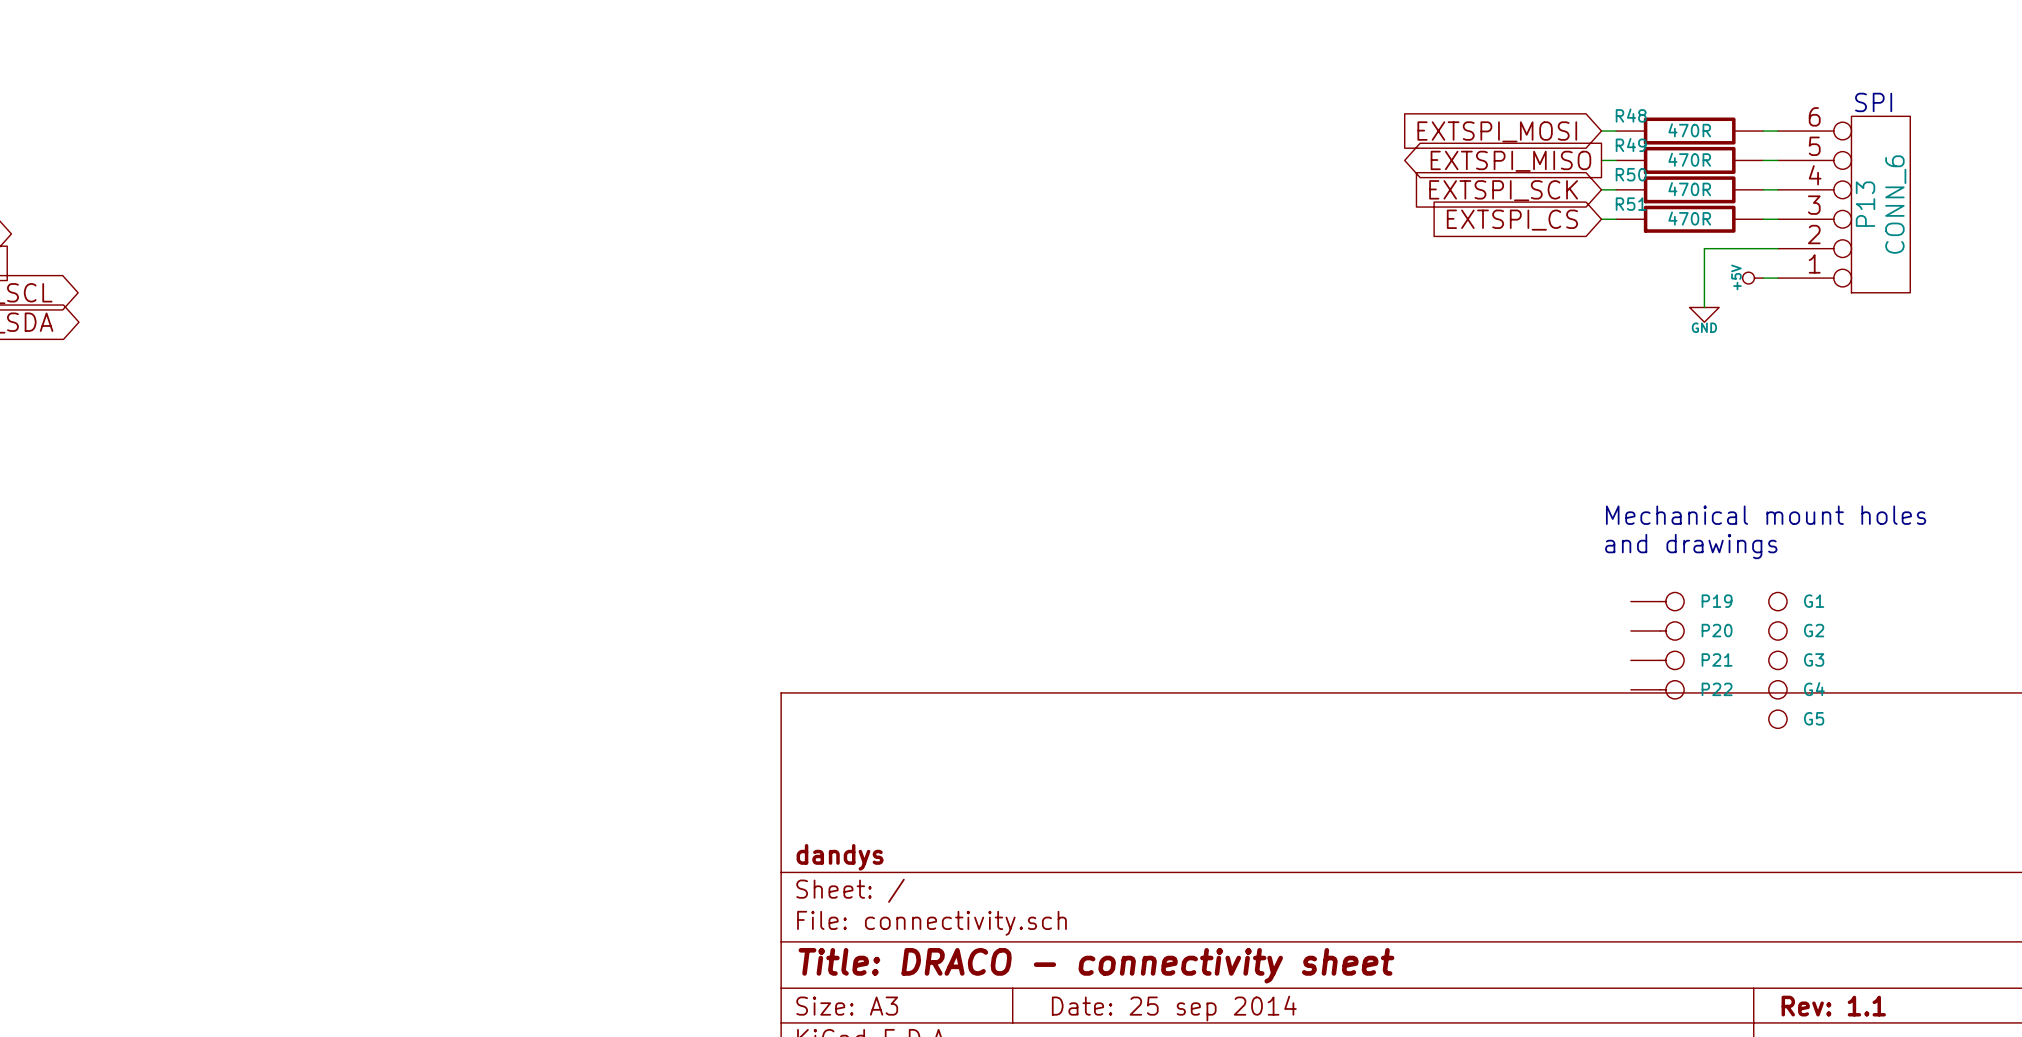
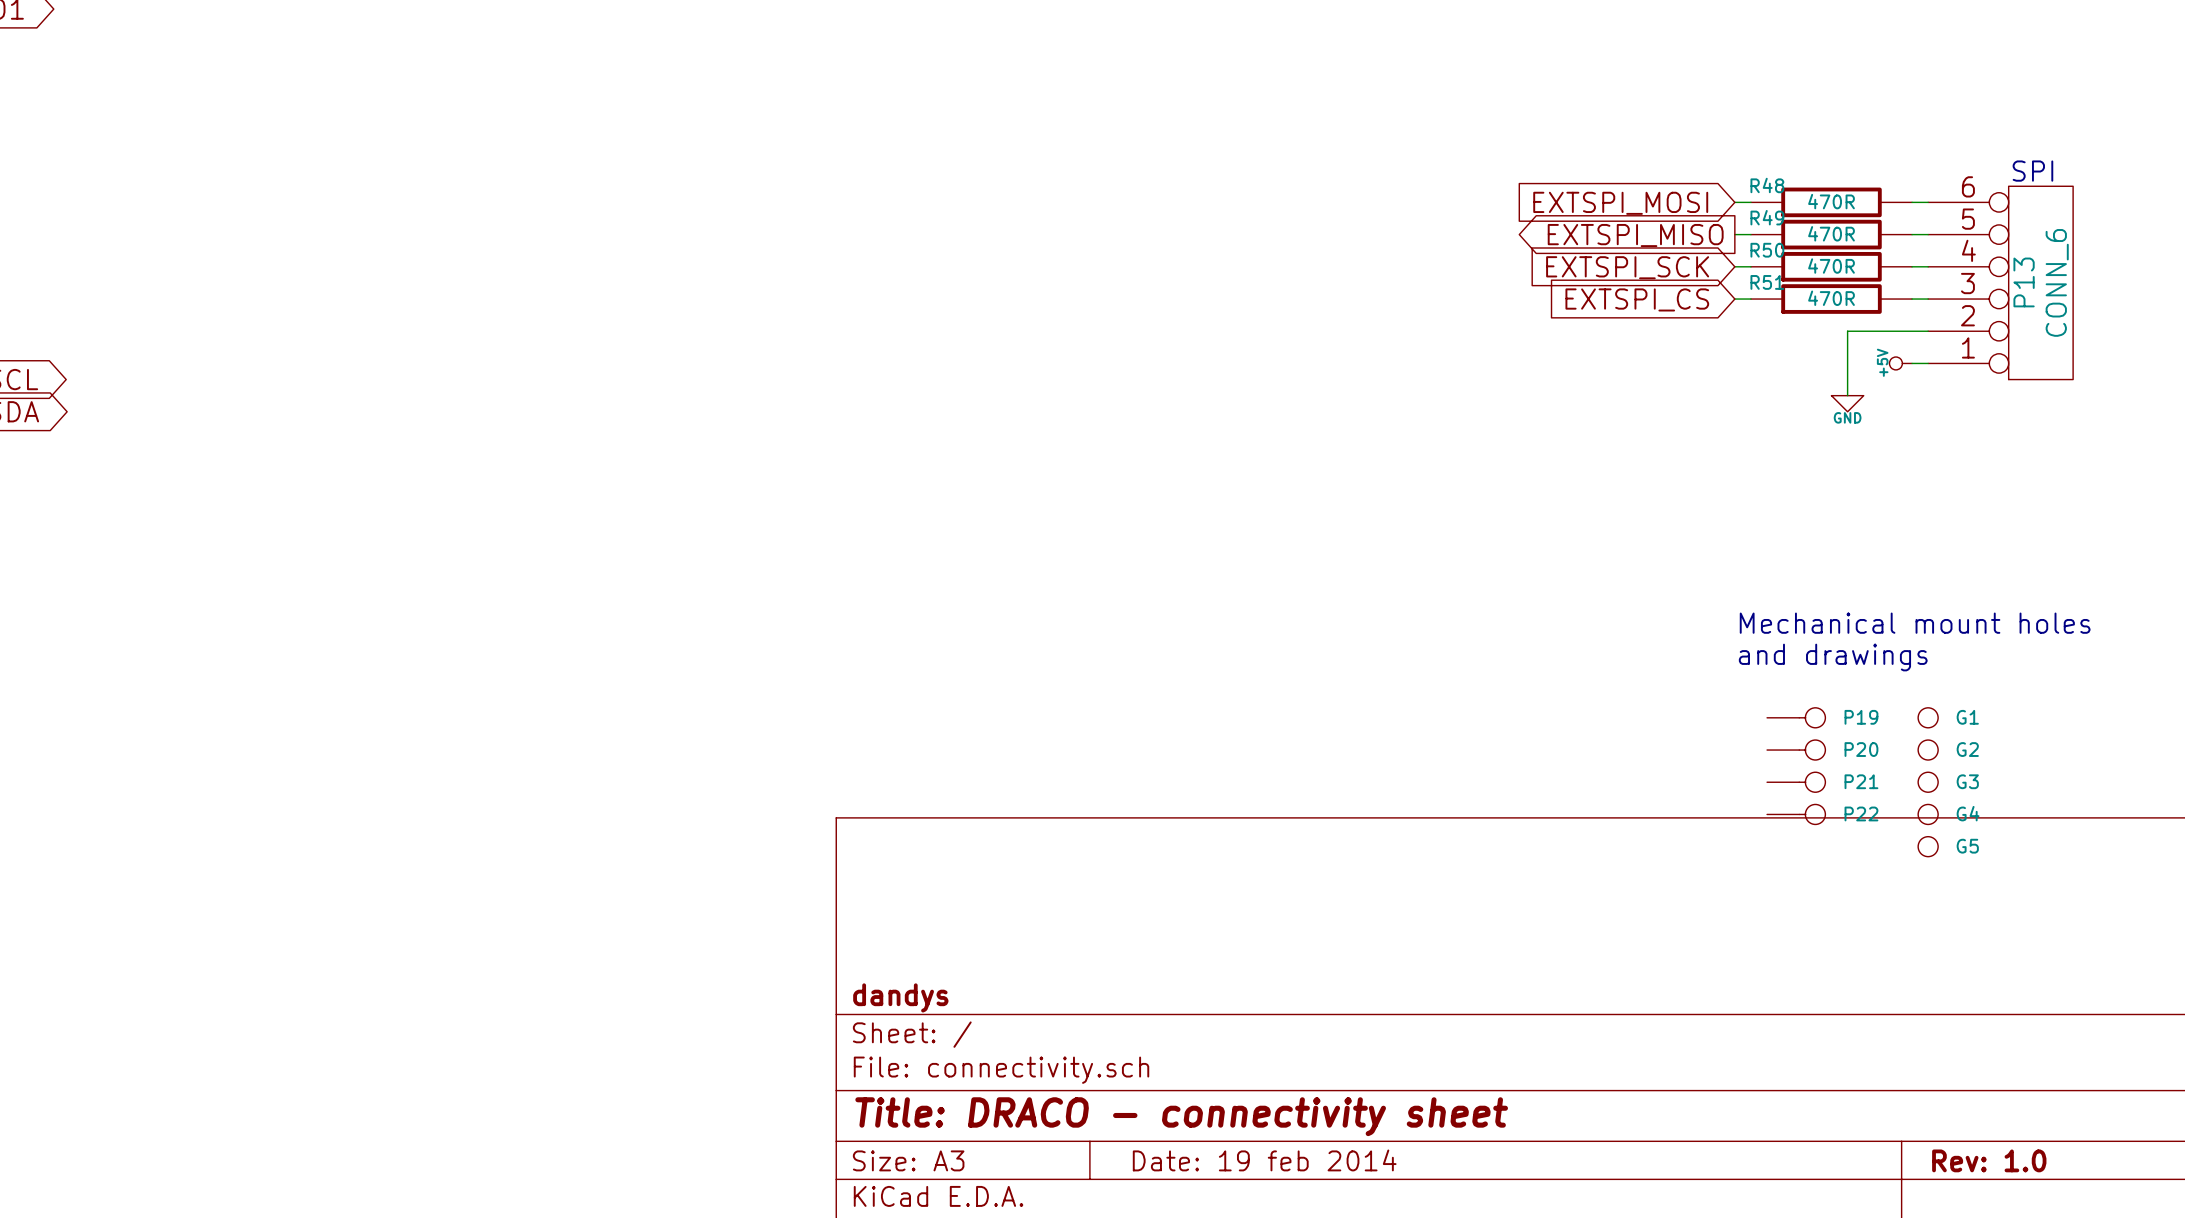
title block: Rev: 1.1 (1833, 1006) -> Rev: 1.0 (1989, 1160)
title block: Date: 25 sep 2014 (1174, 1008) -> Date: 19 feb 2014 (1264, 1160)

